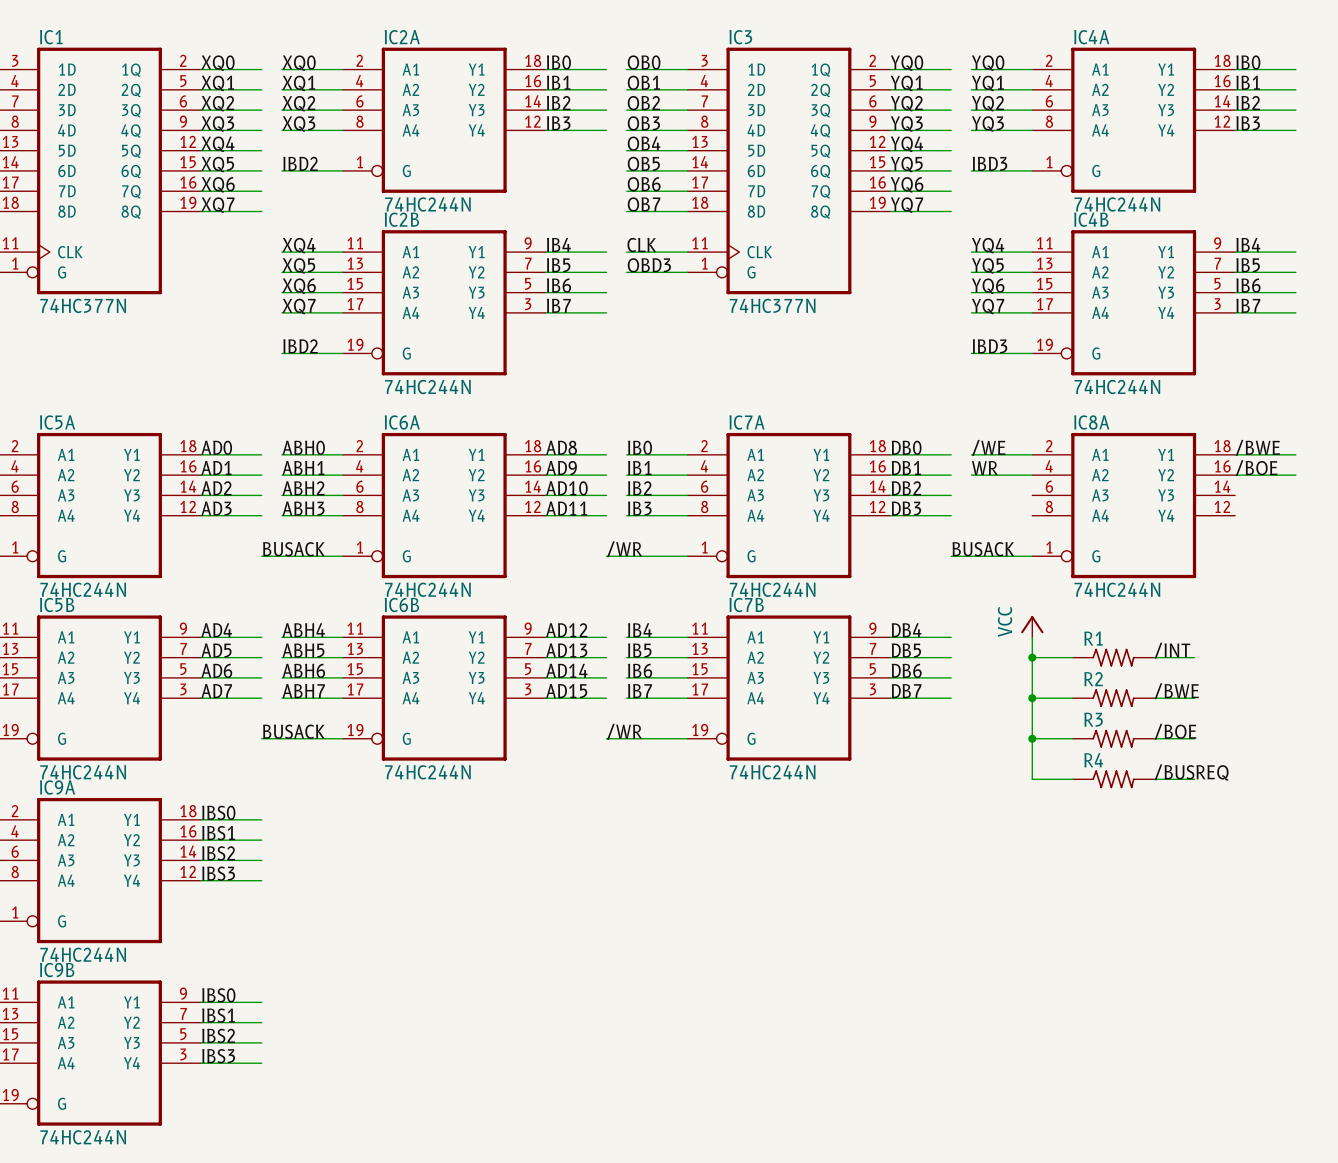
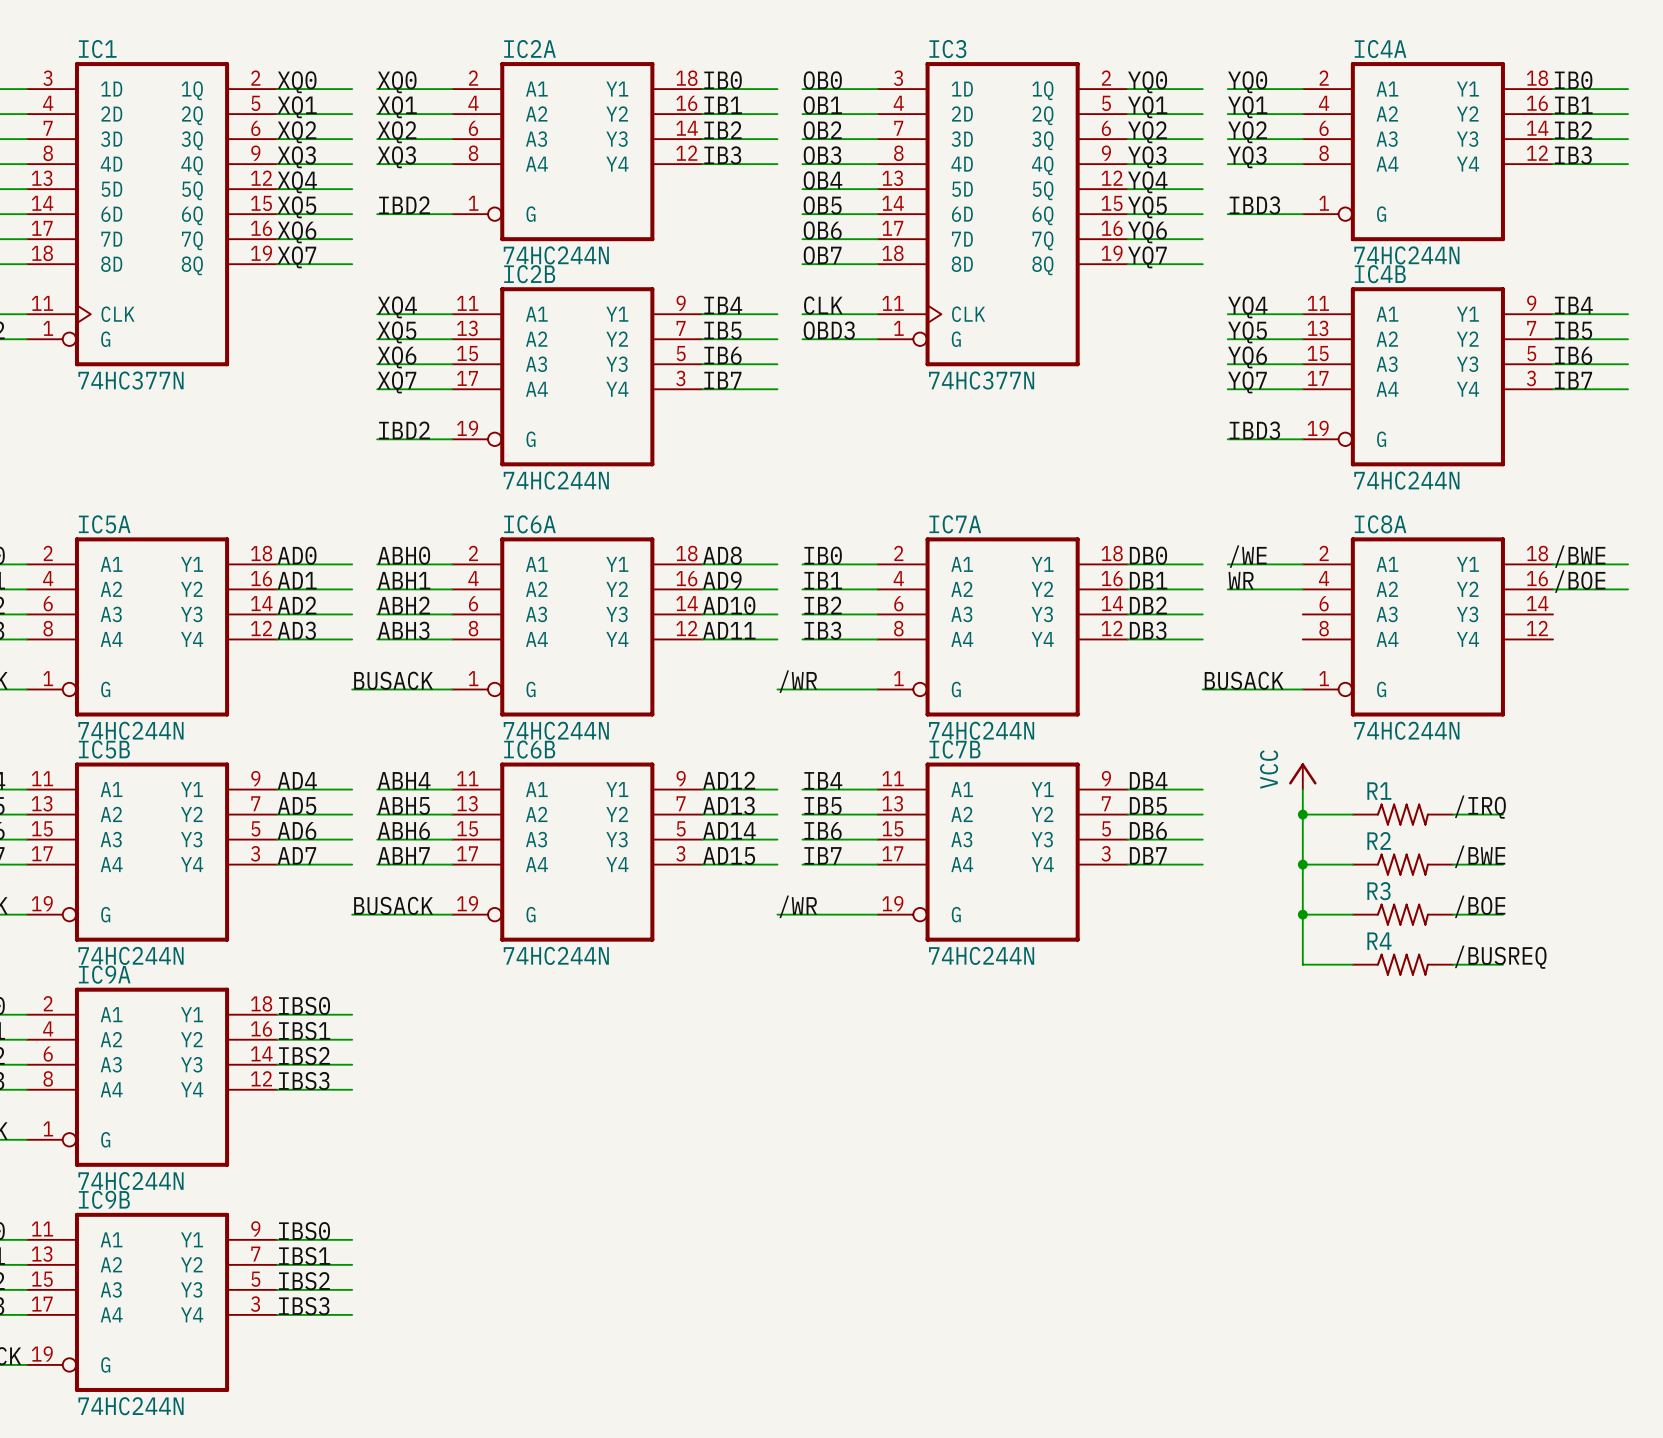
label: /INT (1172, 650) -> /IRQ (1480, 807)

